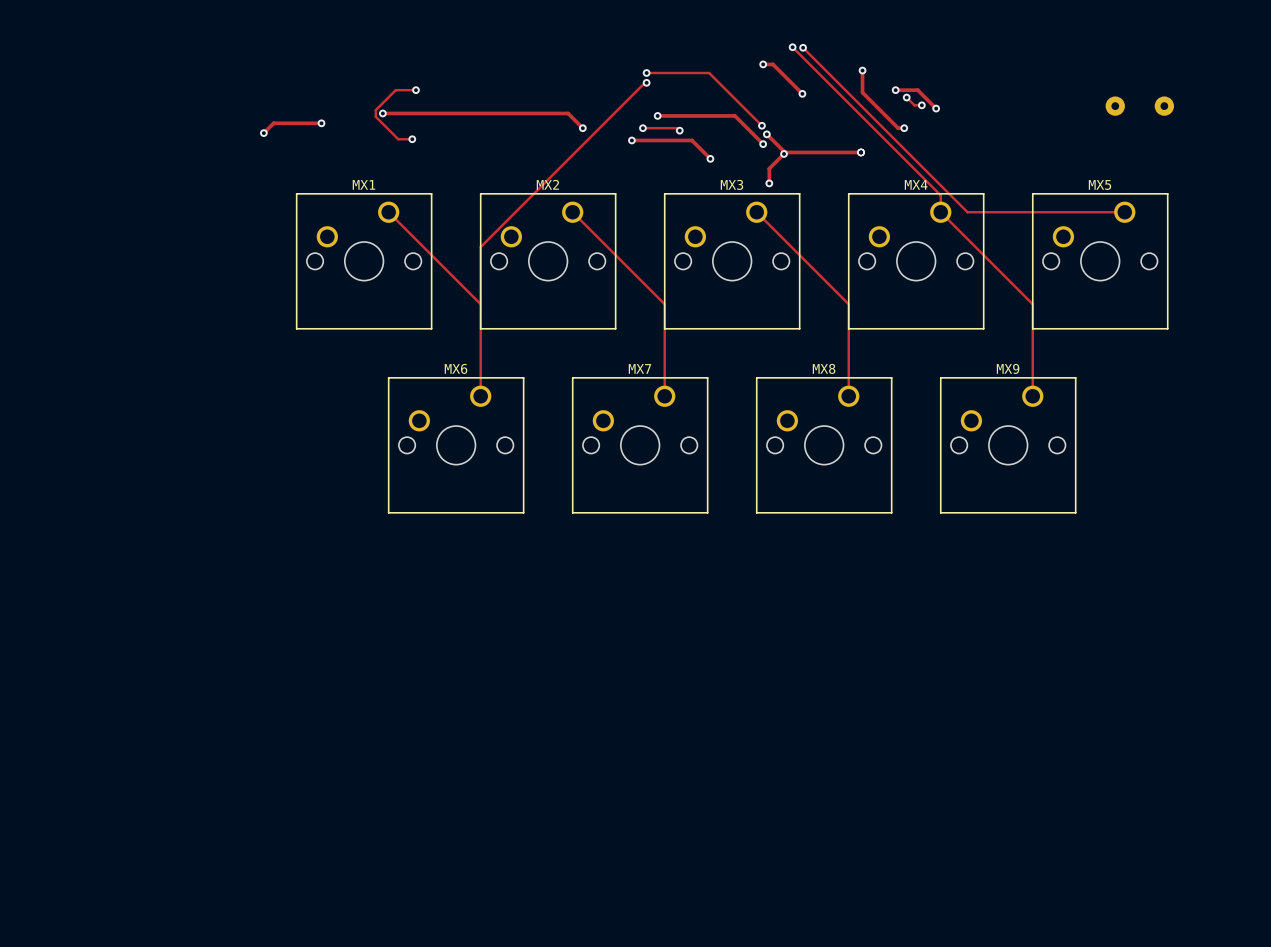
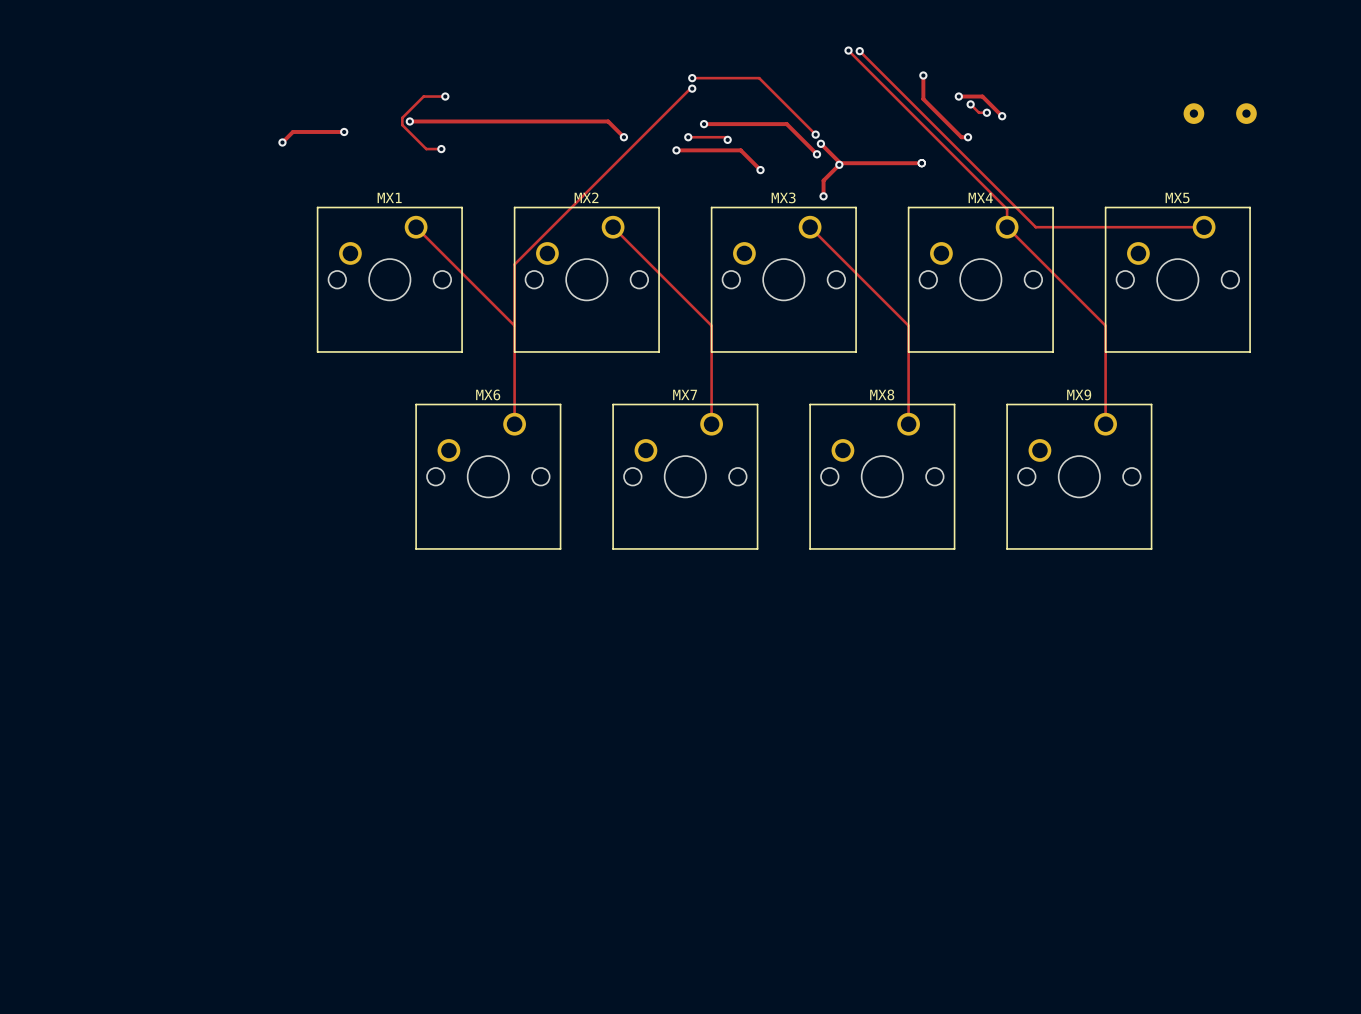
track: (763, 64) (772, 64) (802, 93) -> none
via: (763, 64) -> none
via: (802, 93) -> none

